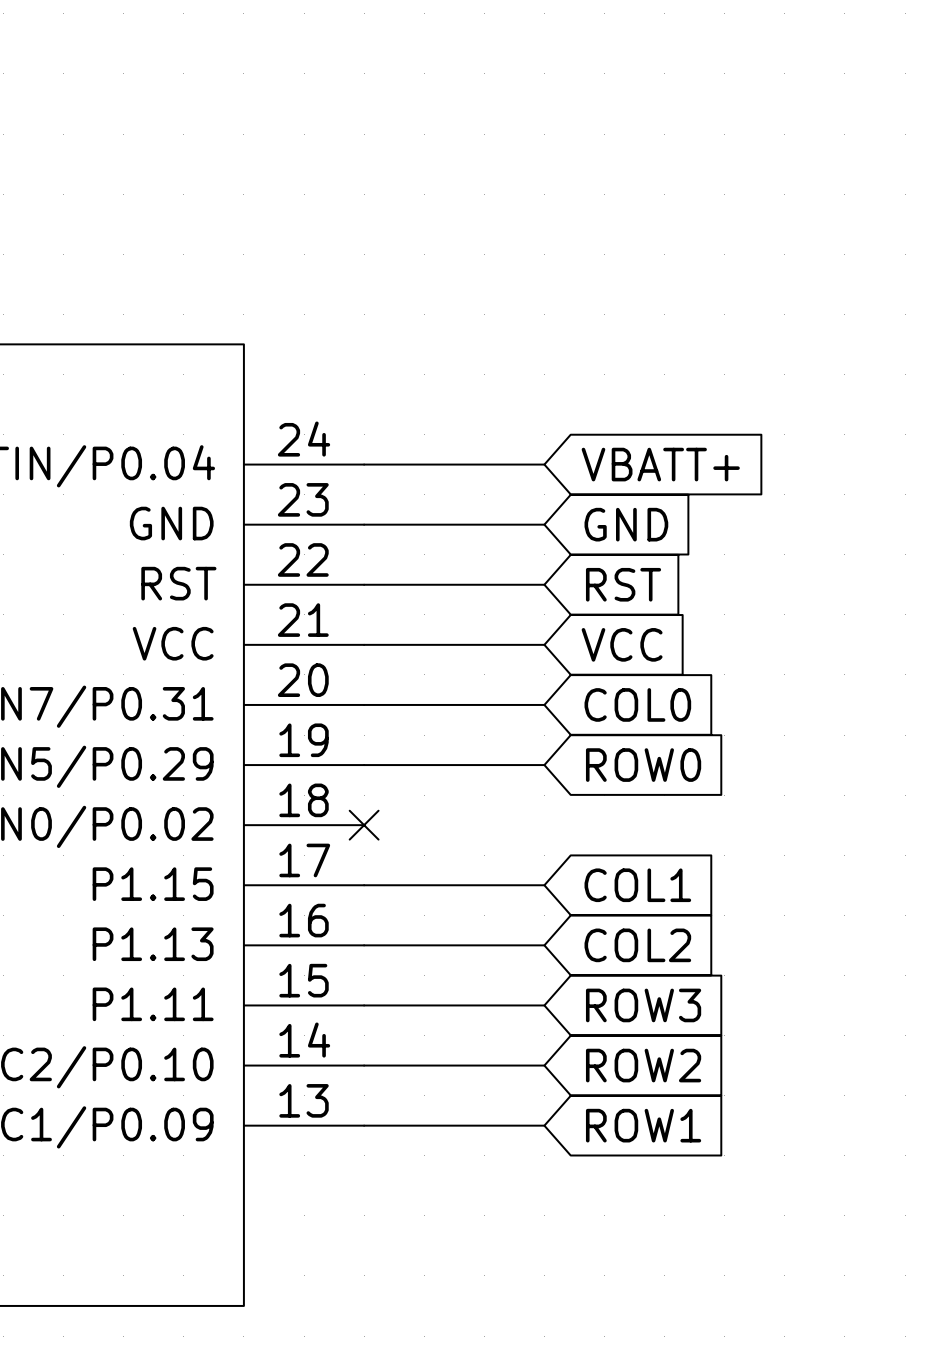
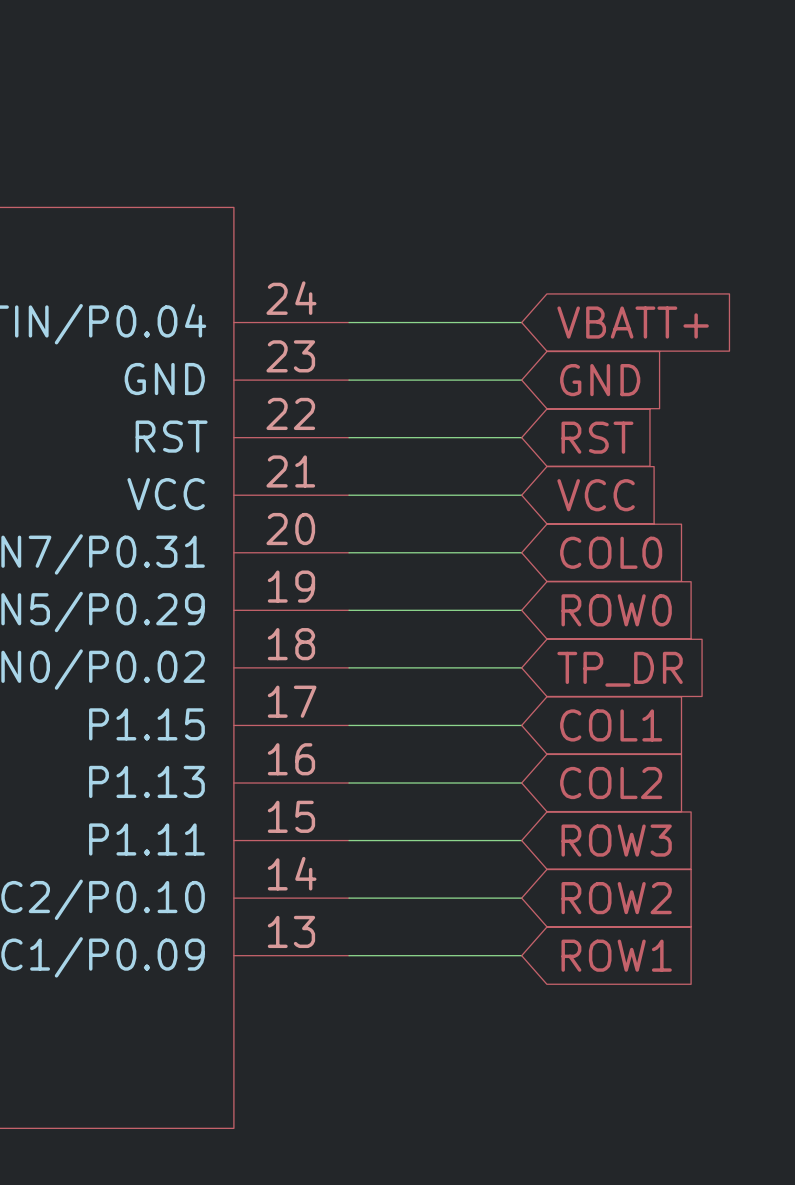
wire: none -> (349, 667) (521, 667)
no-connect mark: (364, 825) -> none
global label: none -> TP_DR (620, 669)

